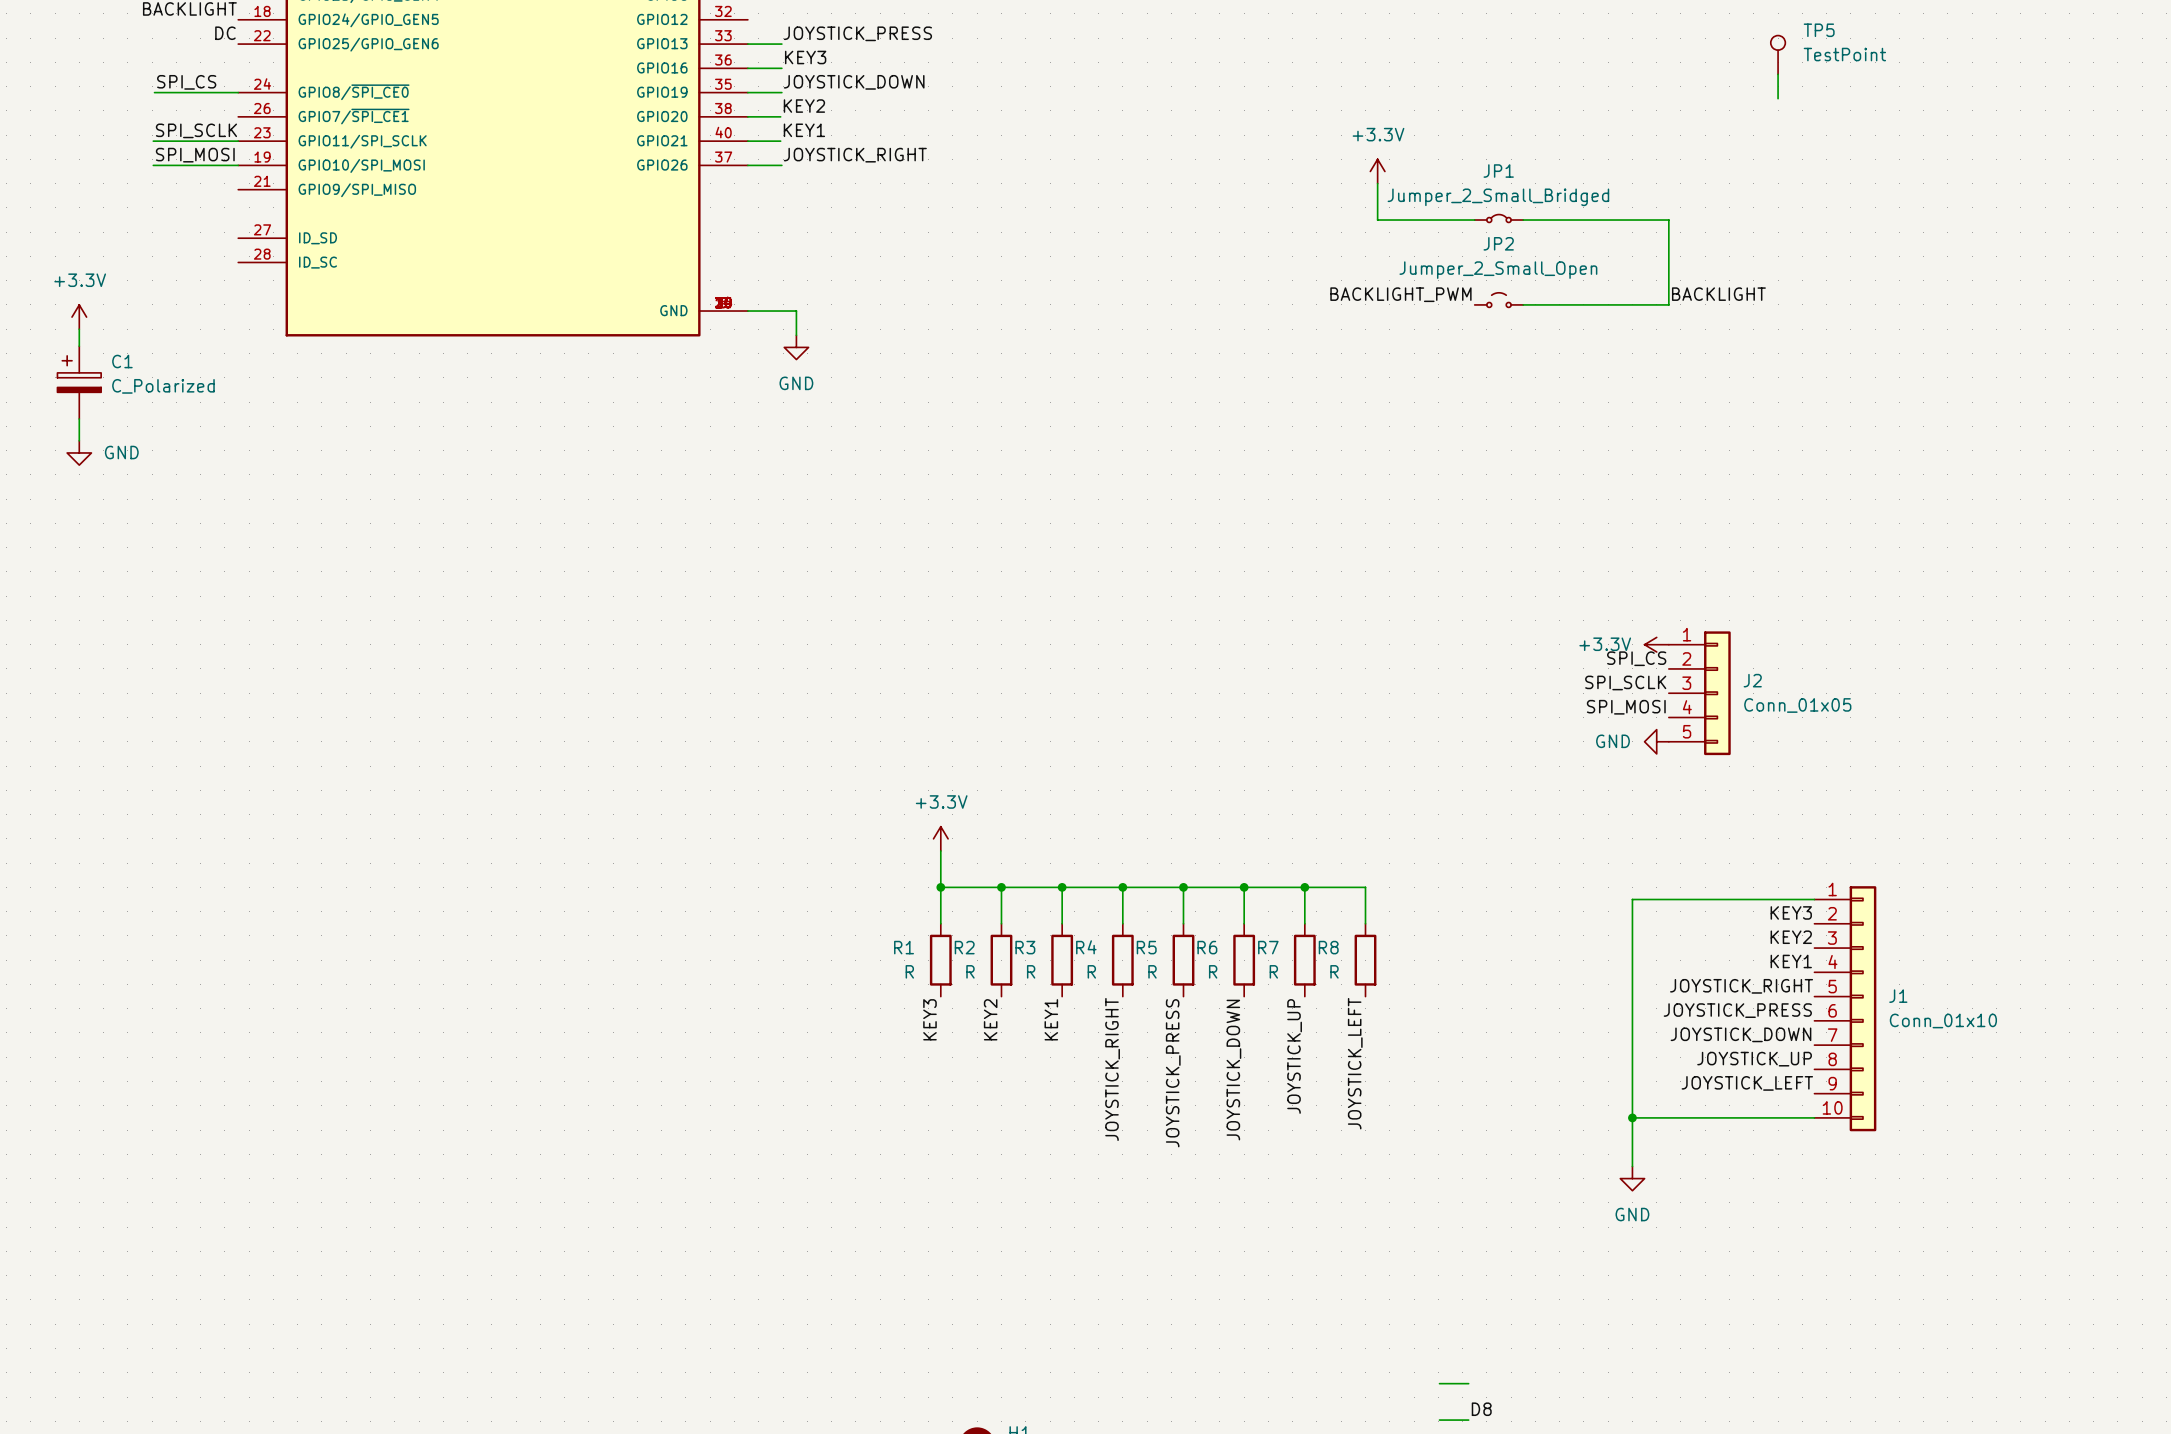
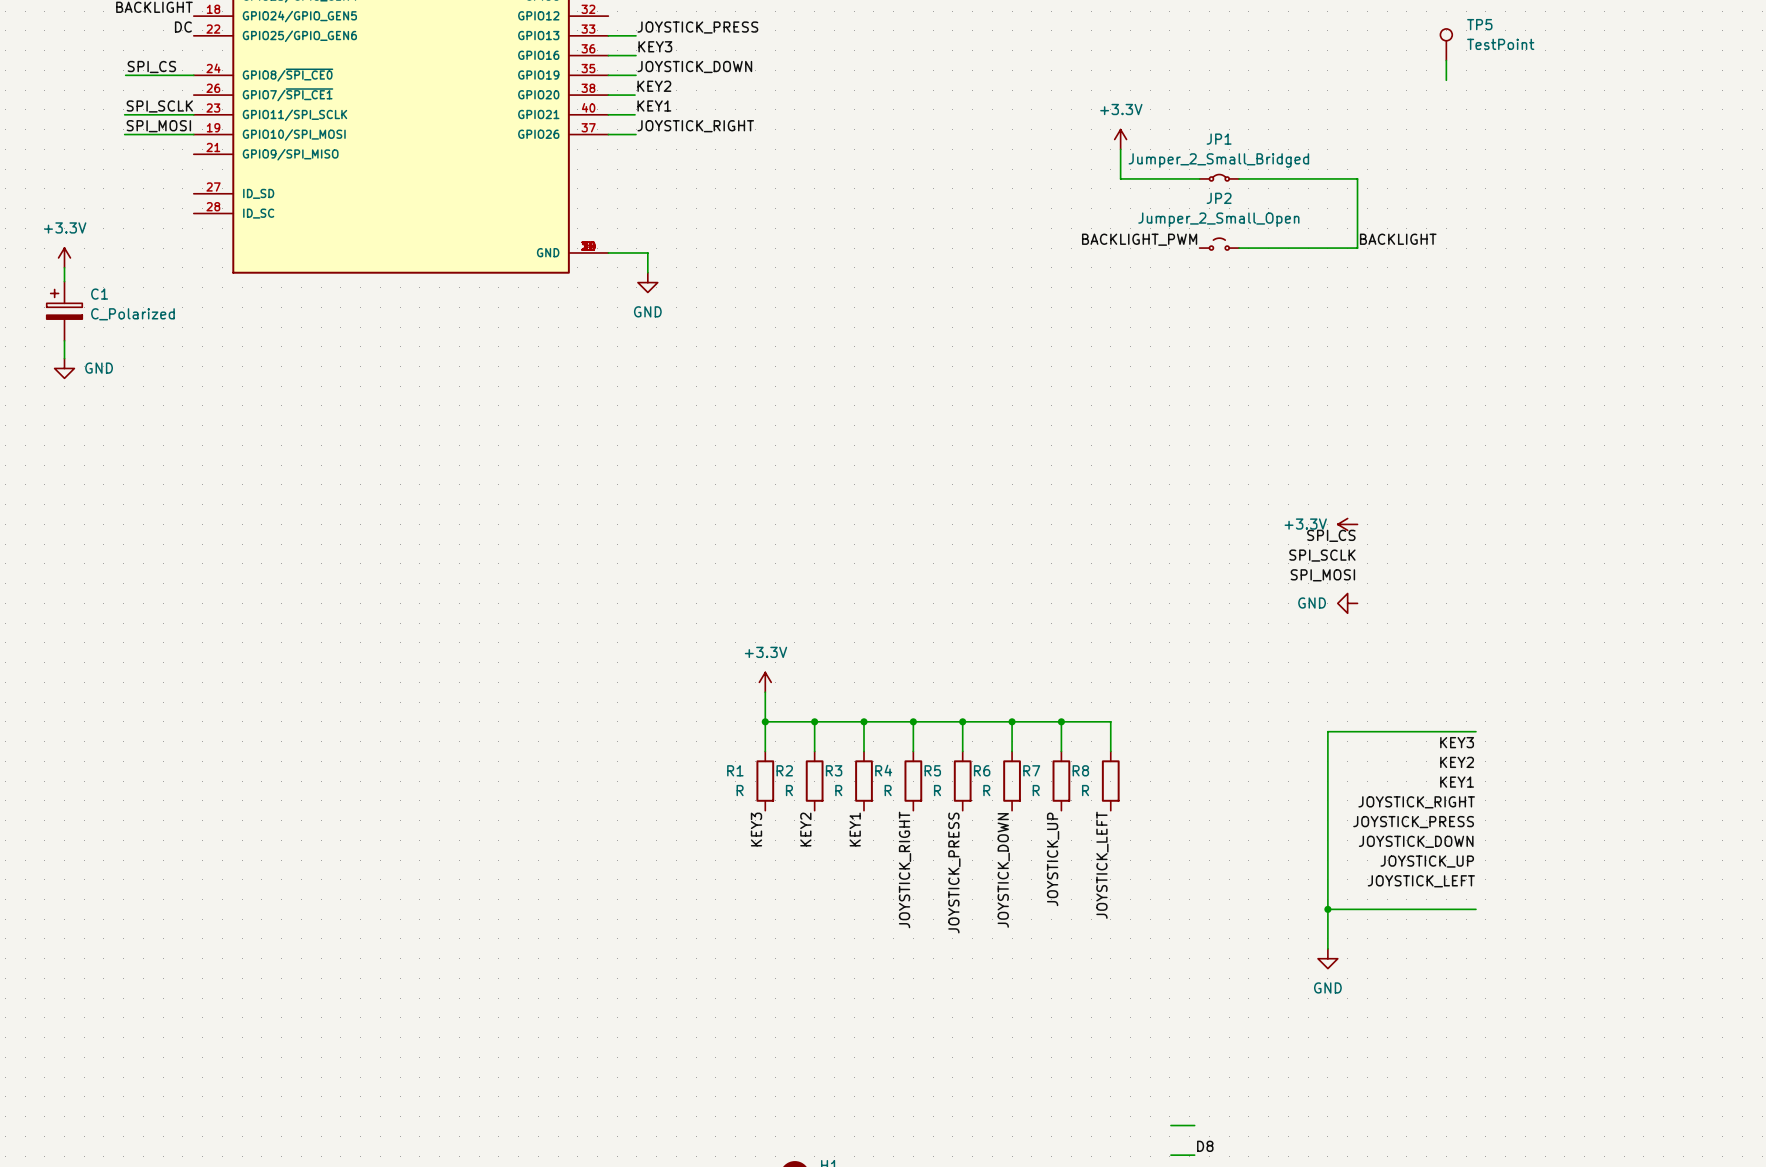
J2: Conn_01x05 (1699, 693) -> none
J1: Conn_01x10 (1845, 1008) -> none

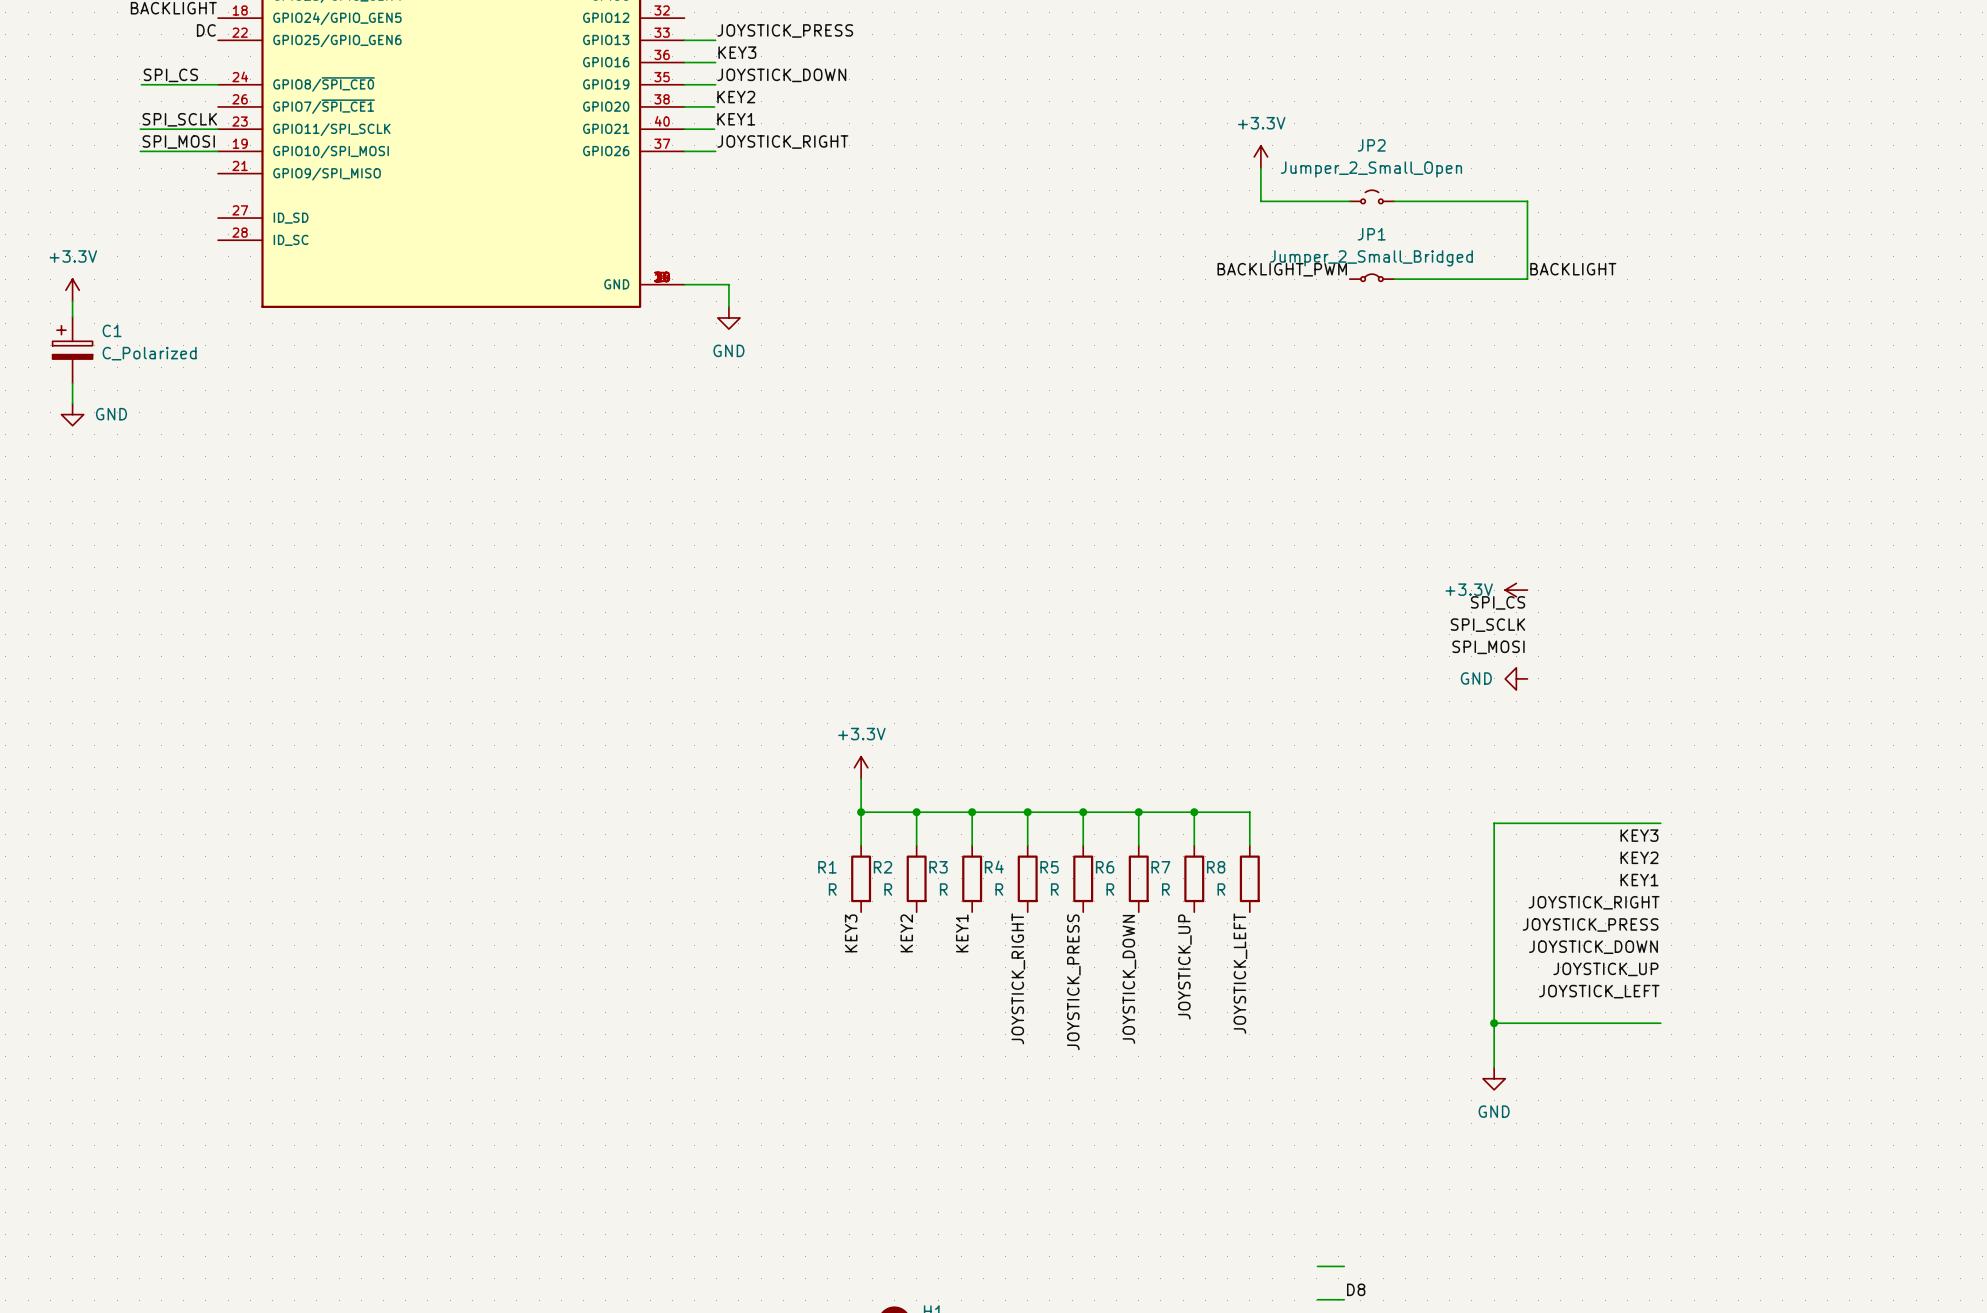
TP5: TestPoint (1446, 44) -> none
wire: (1446, 60) (1446, 80) -> none
JP1 position: (1219, 177) -> (1371, 277)
JP2 position: (1219, 244) -> (1371, 196)

